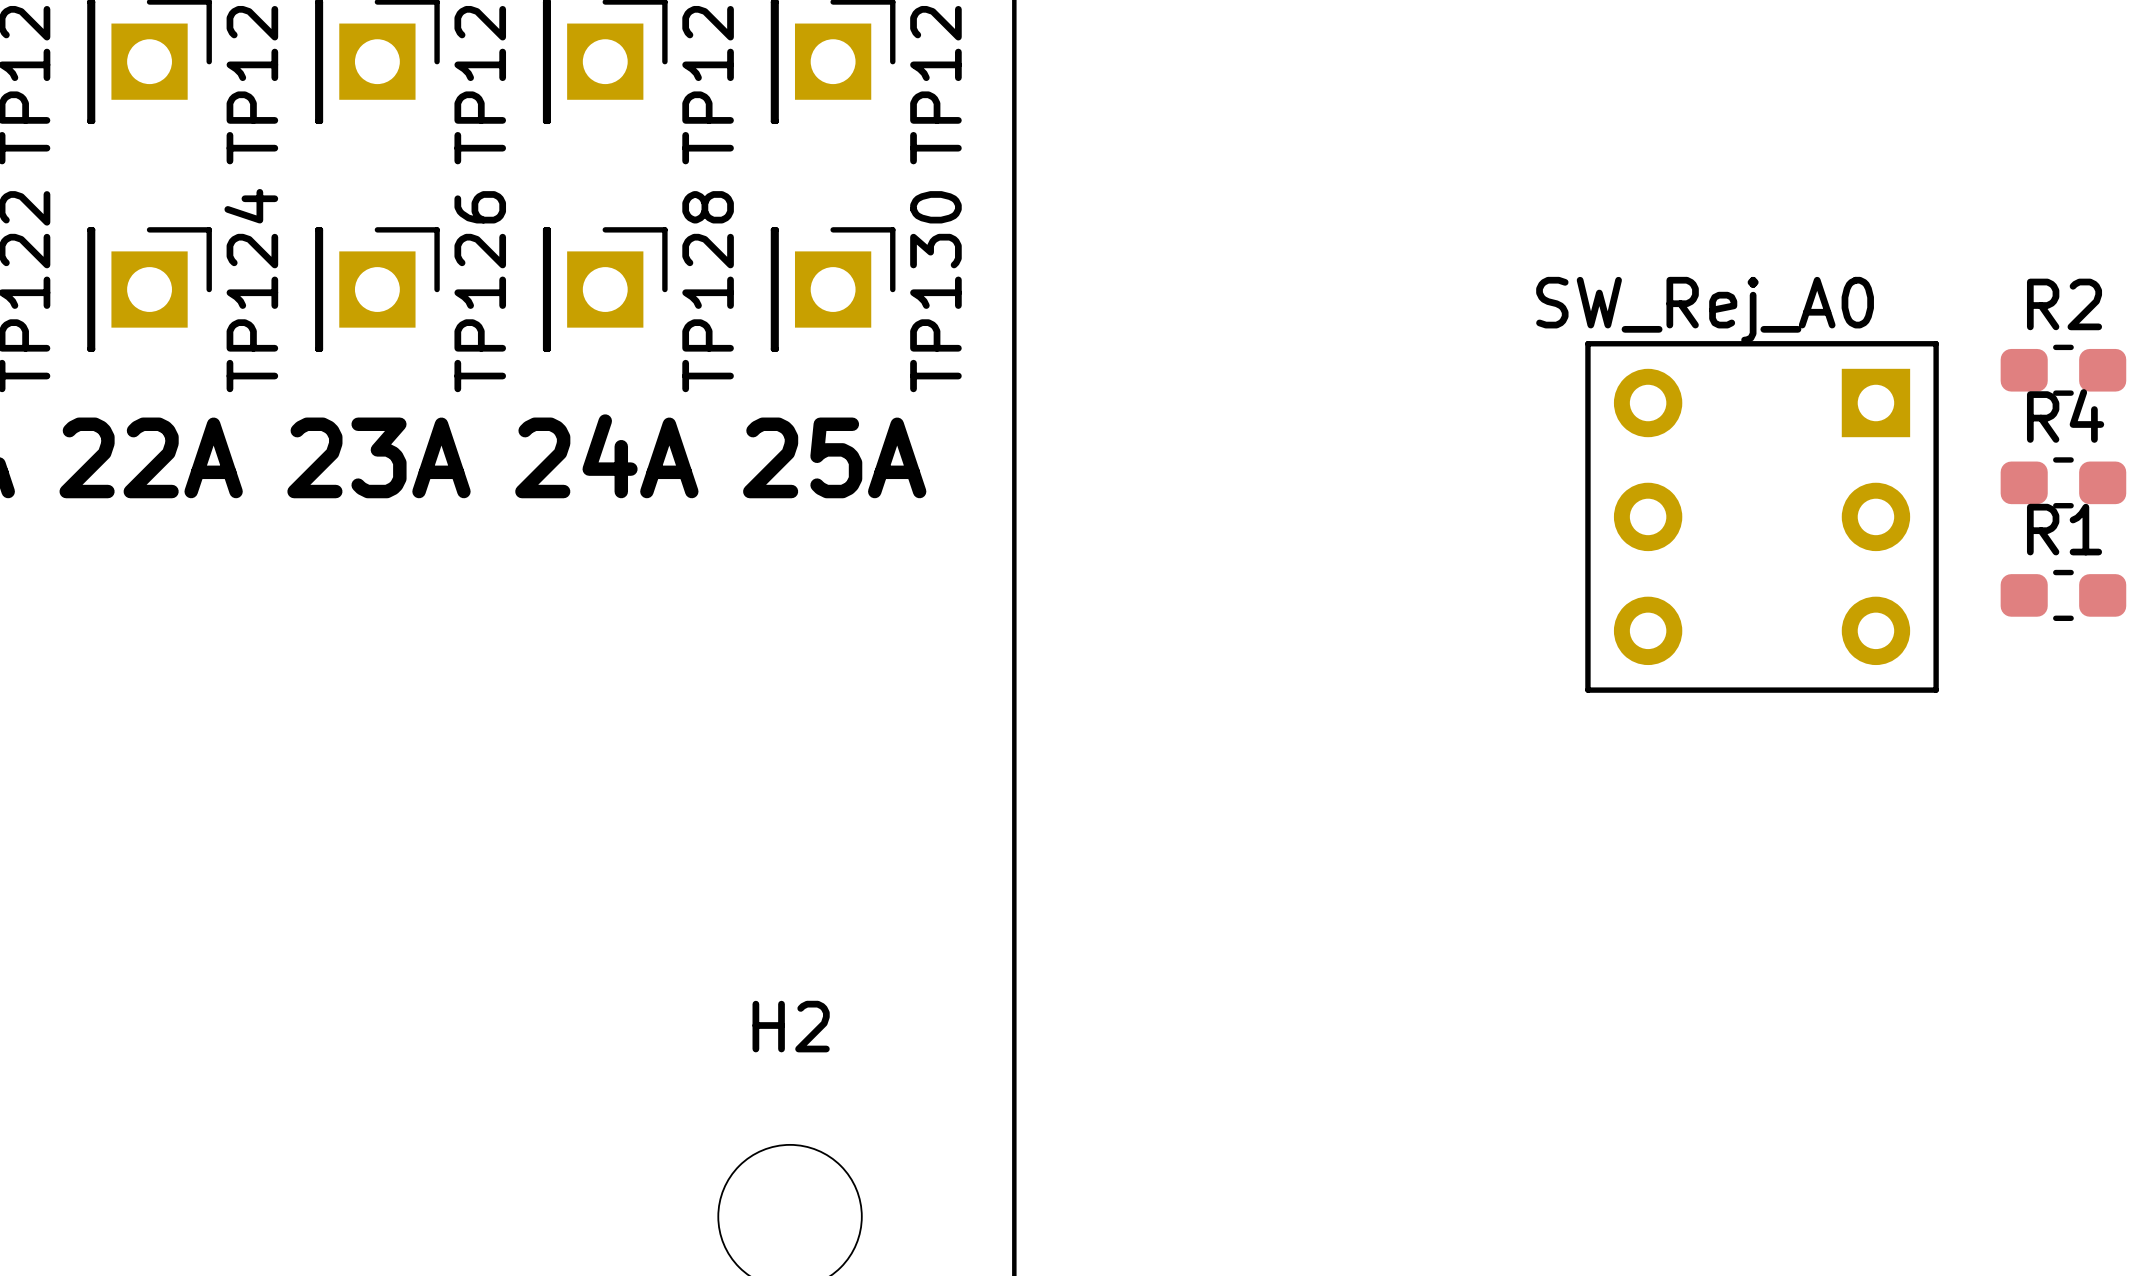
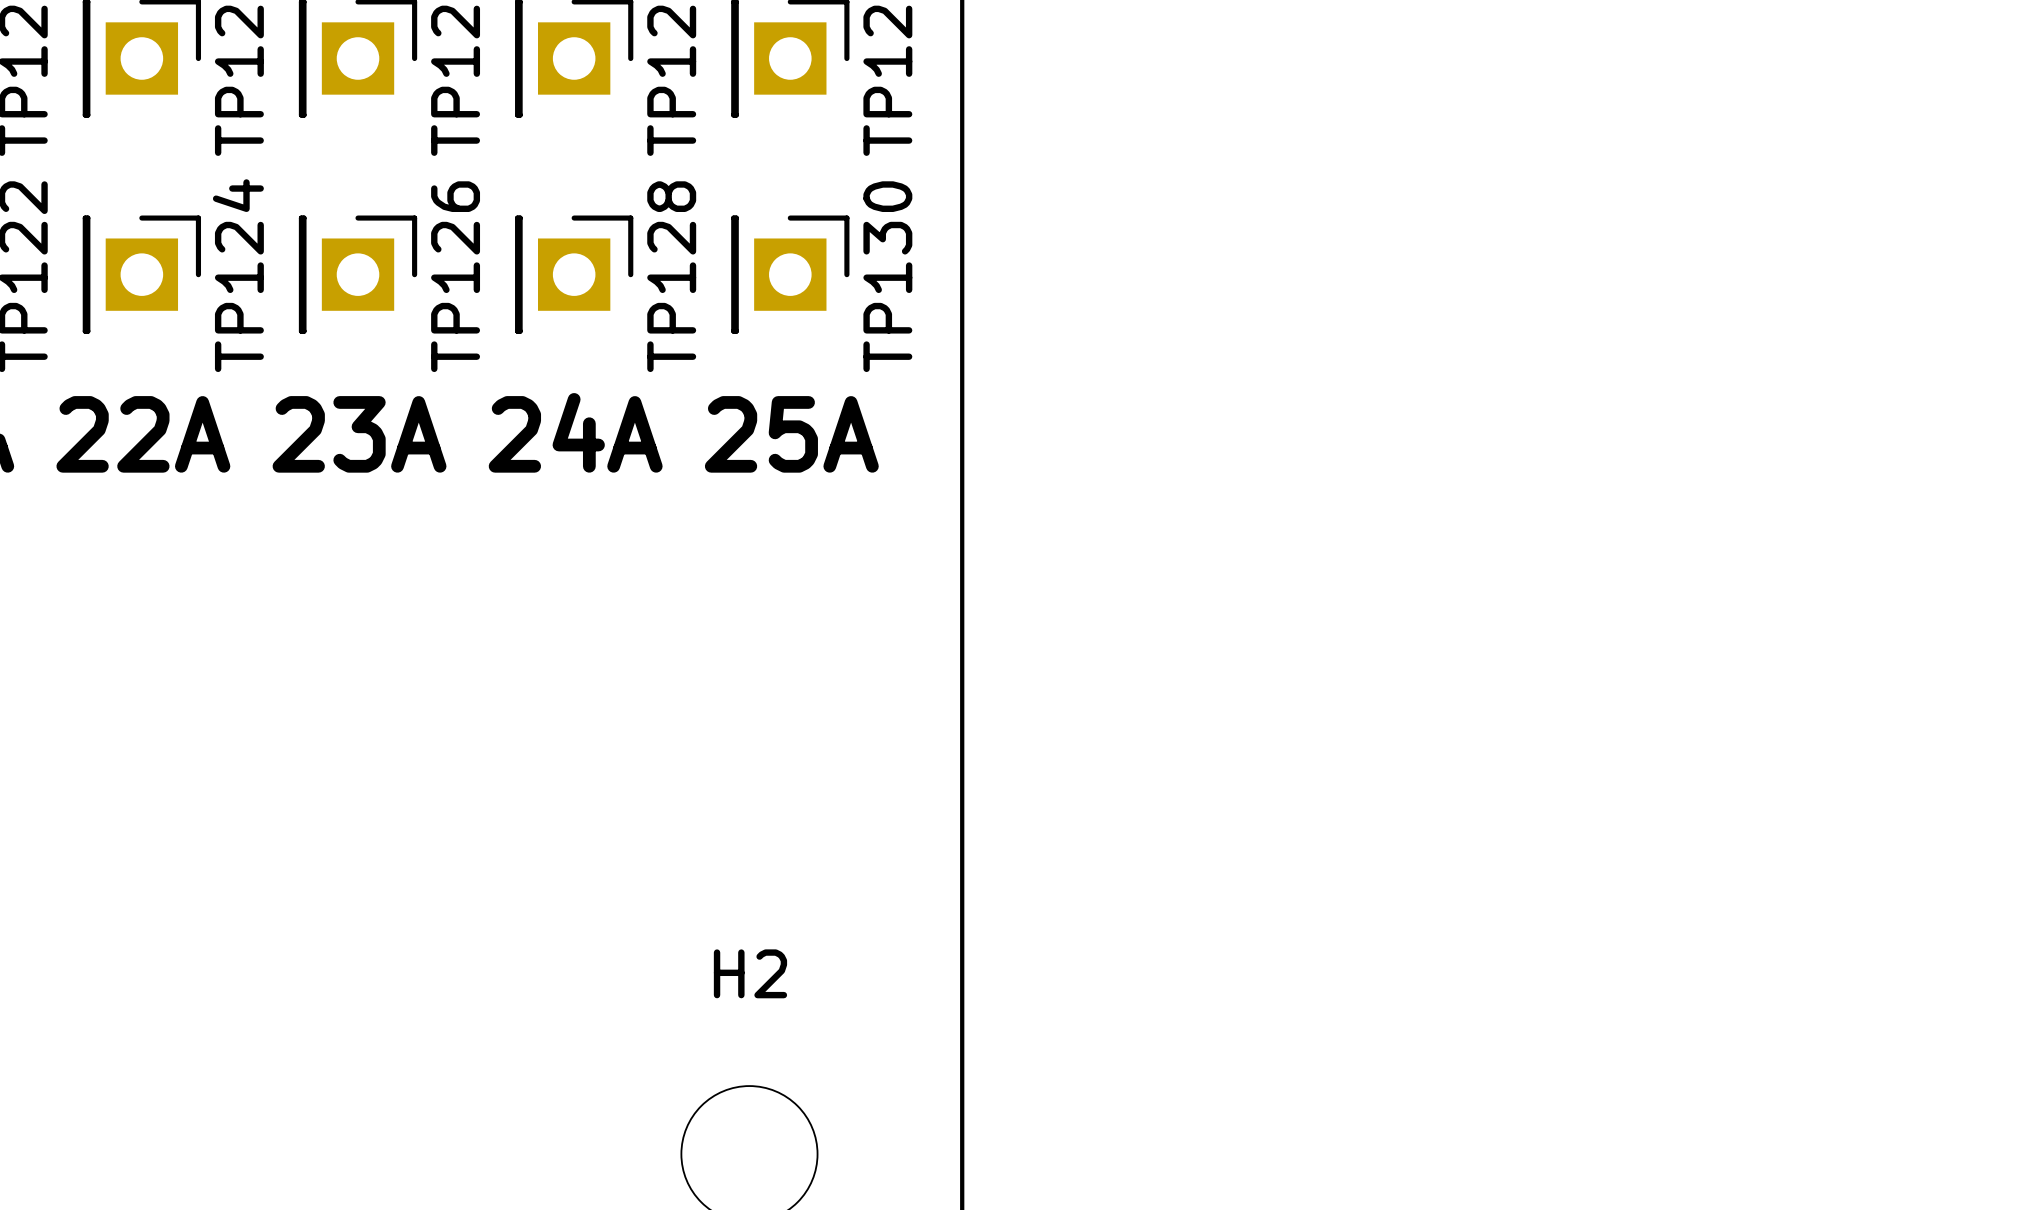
R2: (2063, 370) -> none
R4: (2063, 482) -> none
SW_Rej_A0: (1762, 516) -> none
R1: (2063, 595) -> none

